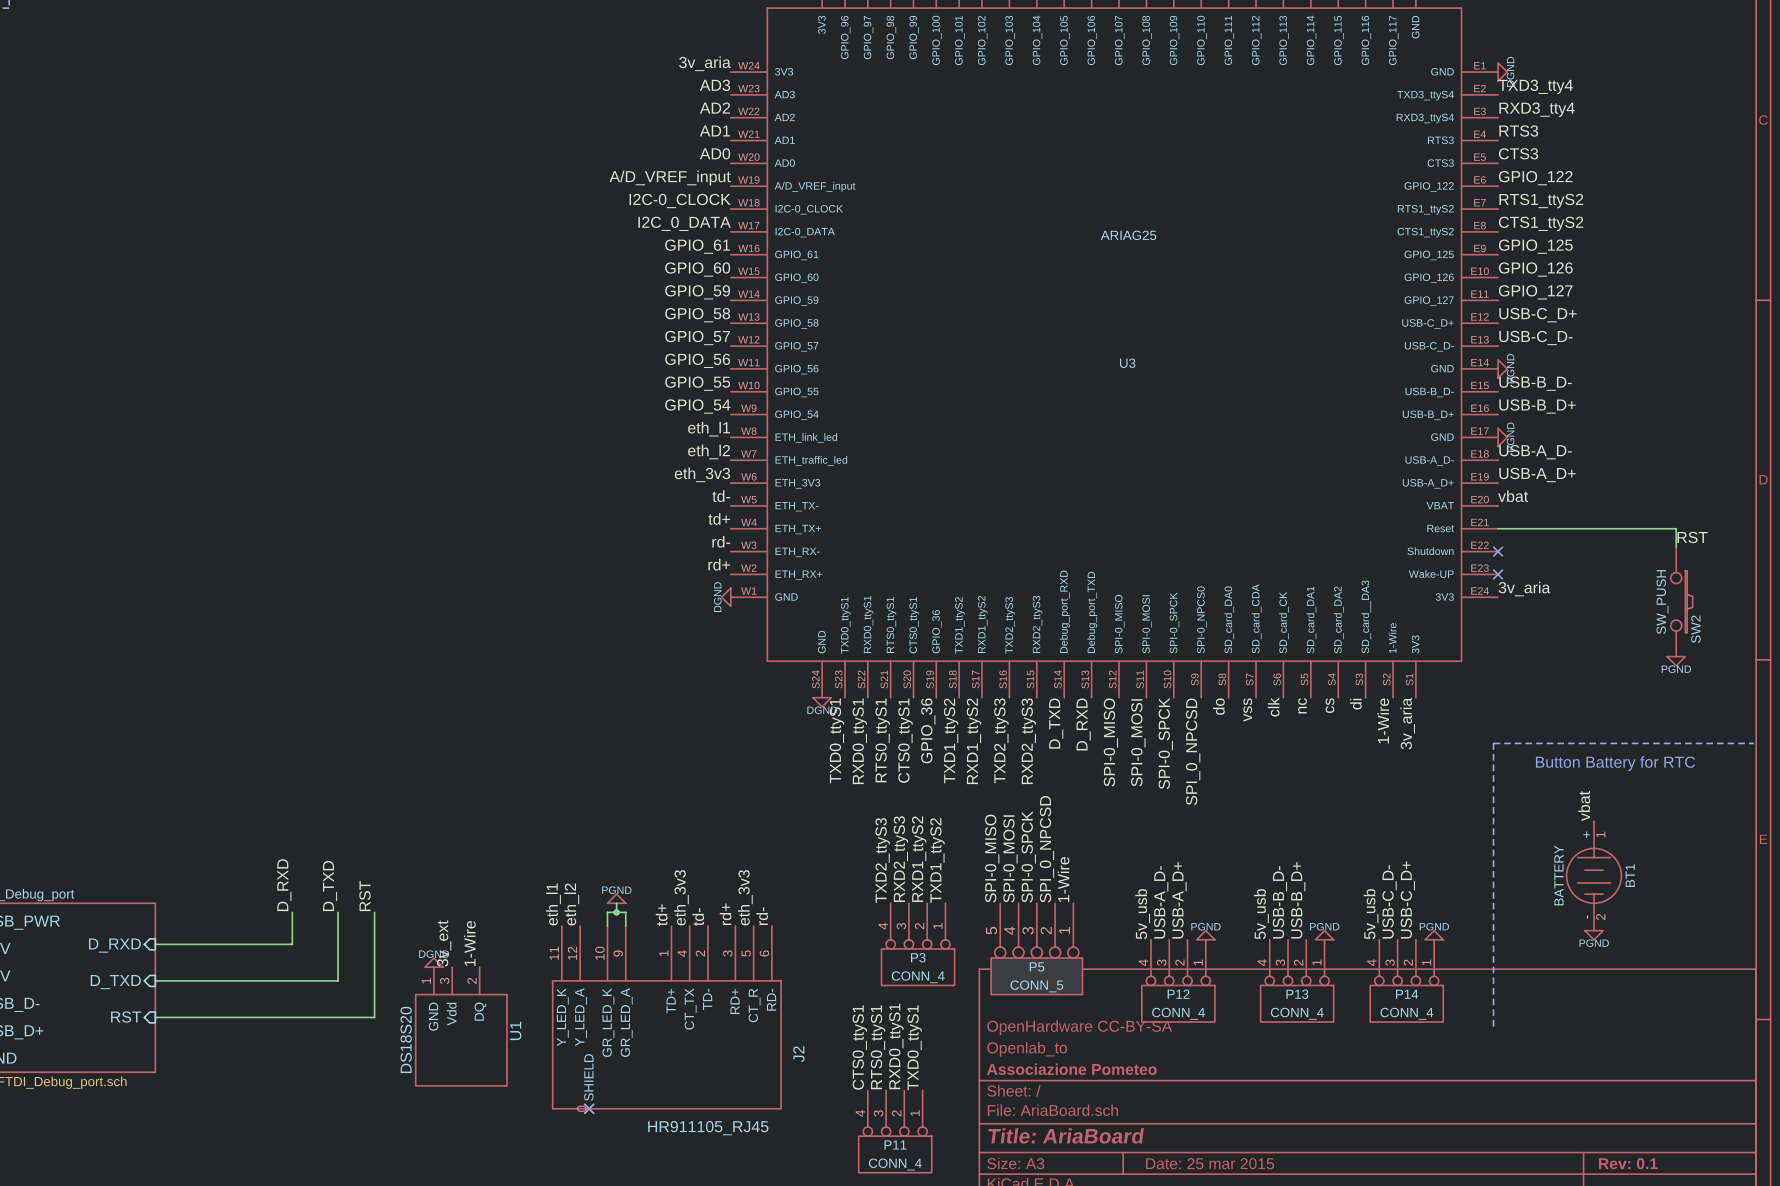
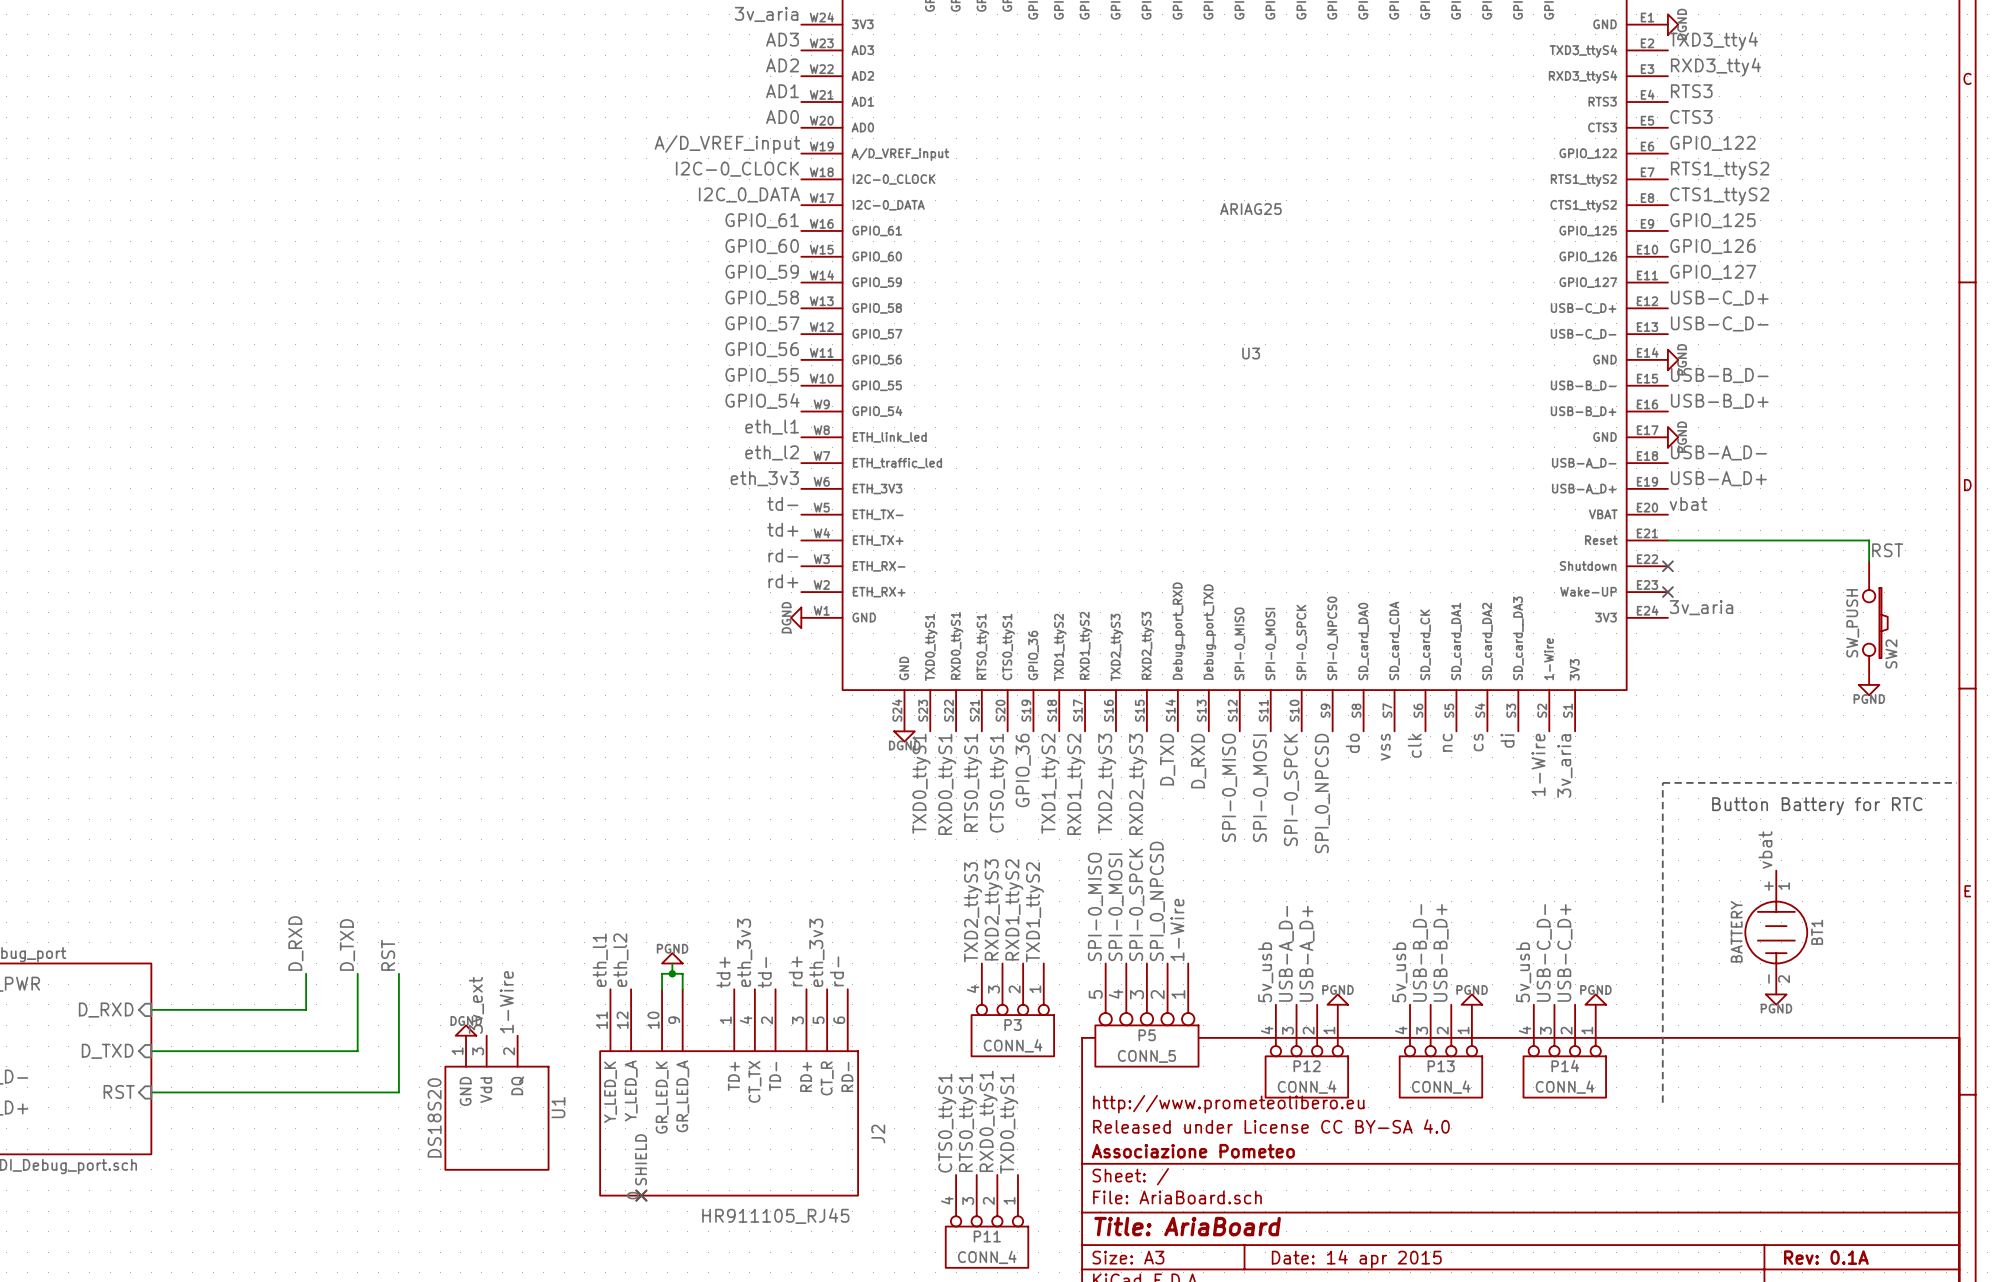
title block: OpenHardware CC-BY-SA (1079, 1027) -> http://www.prometeolibero.eu (1228, 1104)
title block: Openlab_to (1027, 1049) -> Released under License CC BY-SA 4.0 (1271, 1126)
title block: Date: 25 mar 2015 (1210, 1163) -> Date: 14 apr 2015 (1356, 1259)
title block: Rev: 0.1 (1628, 1163) -> Rev: 0.1A (1826, 1257)

